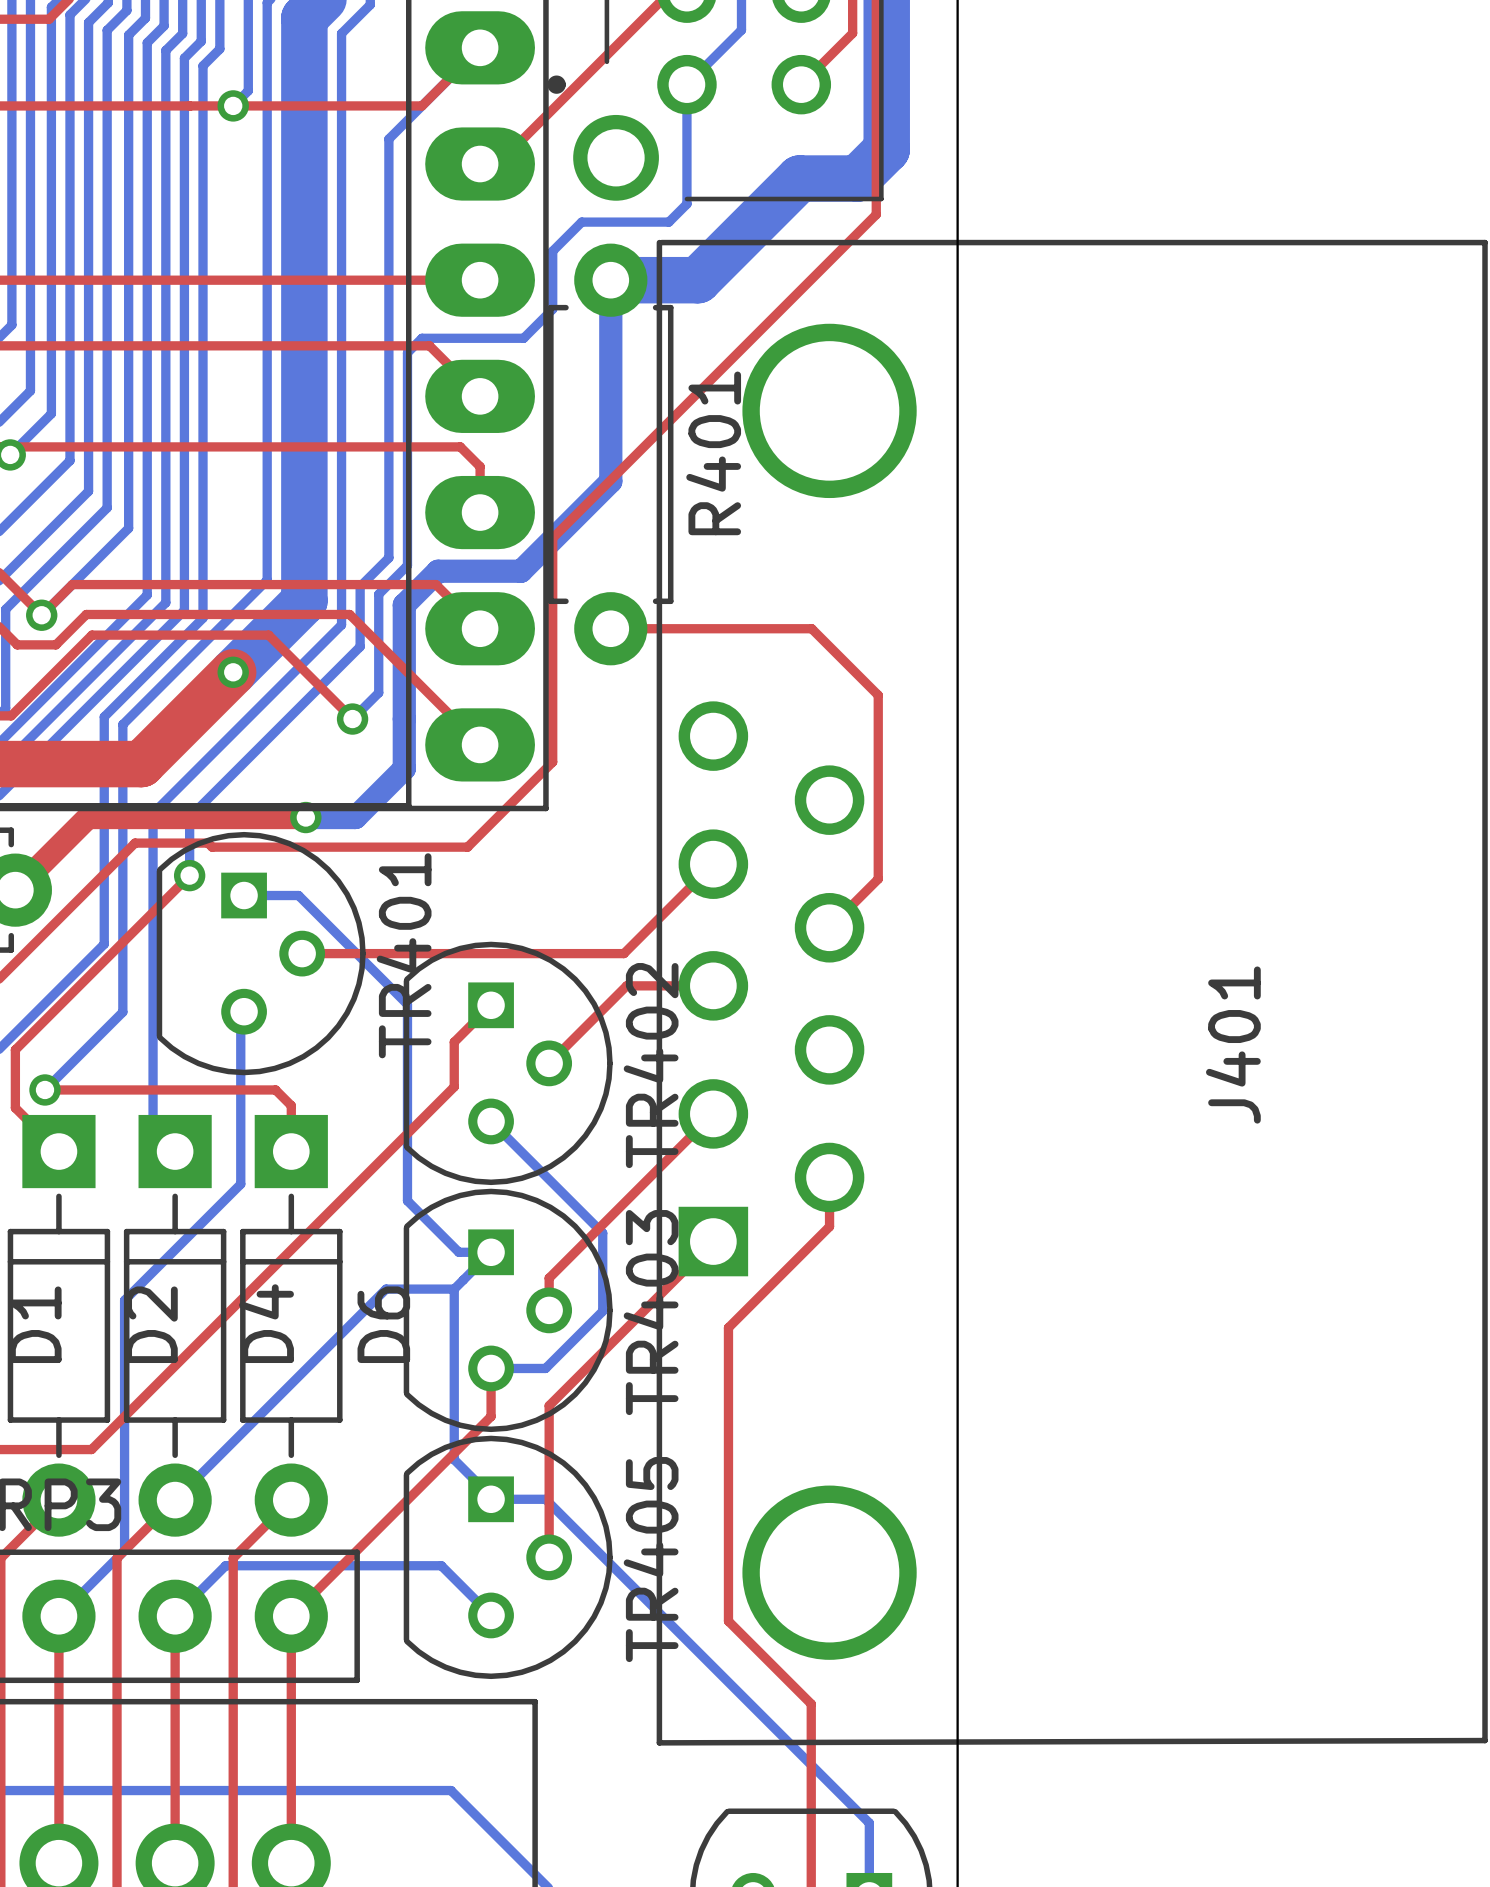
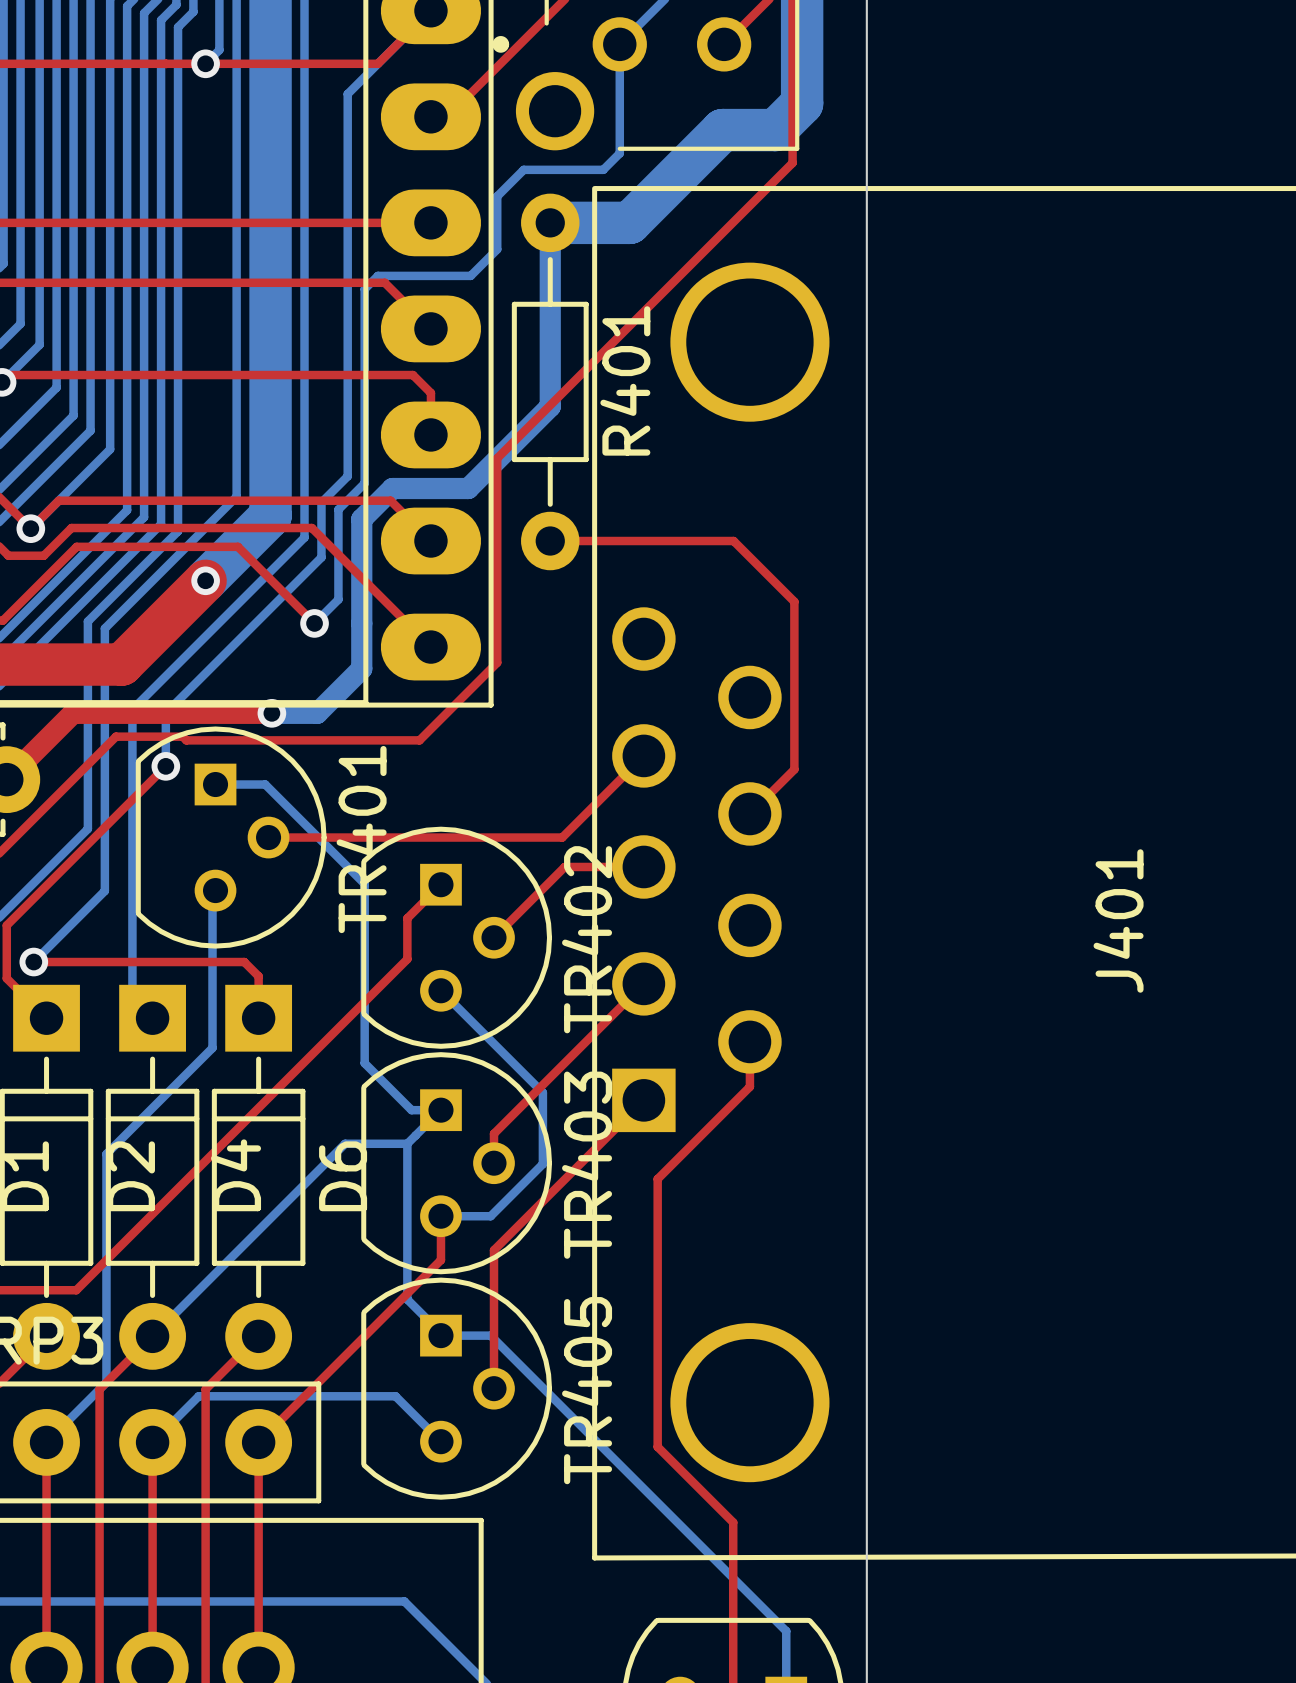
R401 footprint: [548, 243, 674, 666] -> [511, 193, 589, 571]

